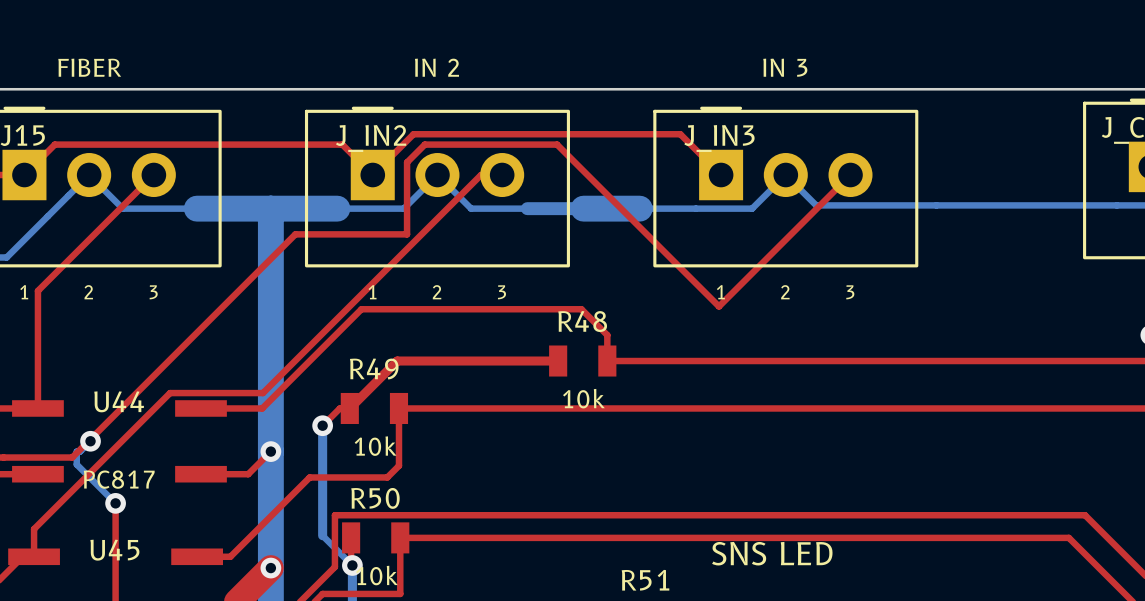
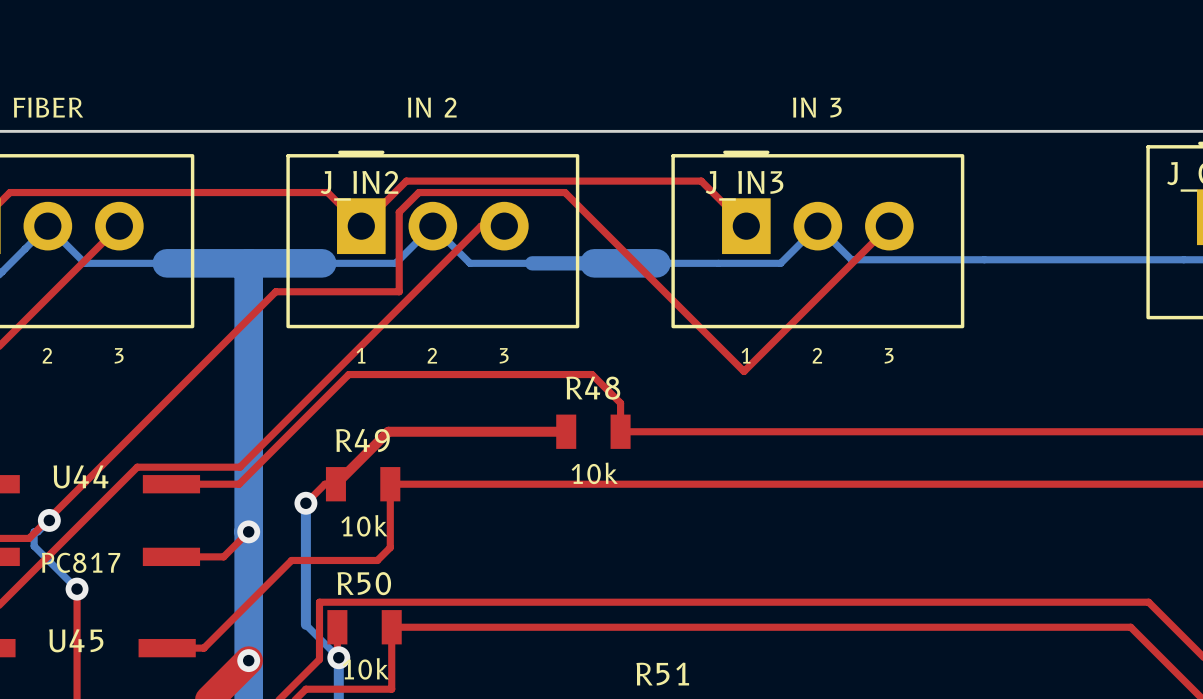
text: SNS LED (772, 553) -> none

